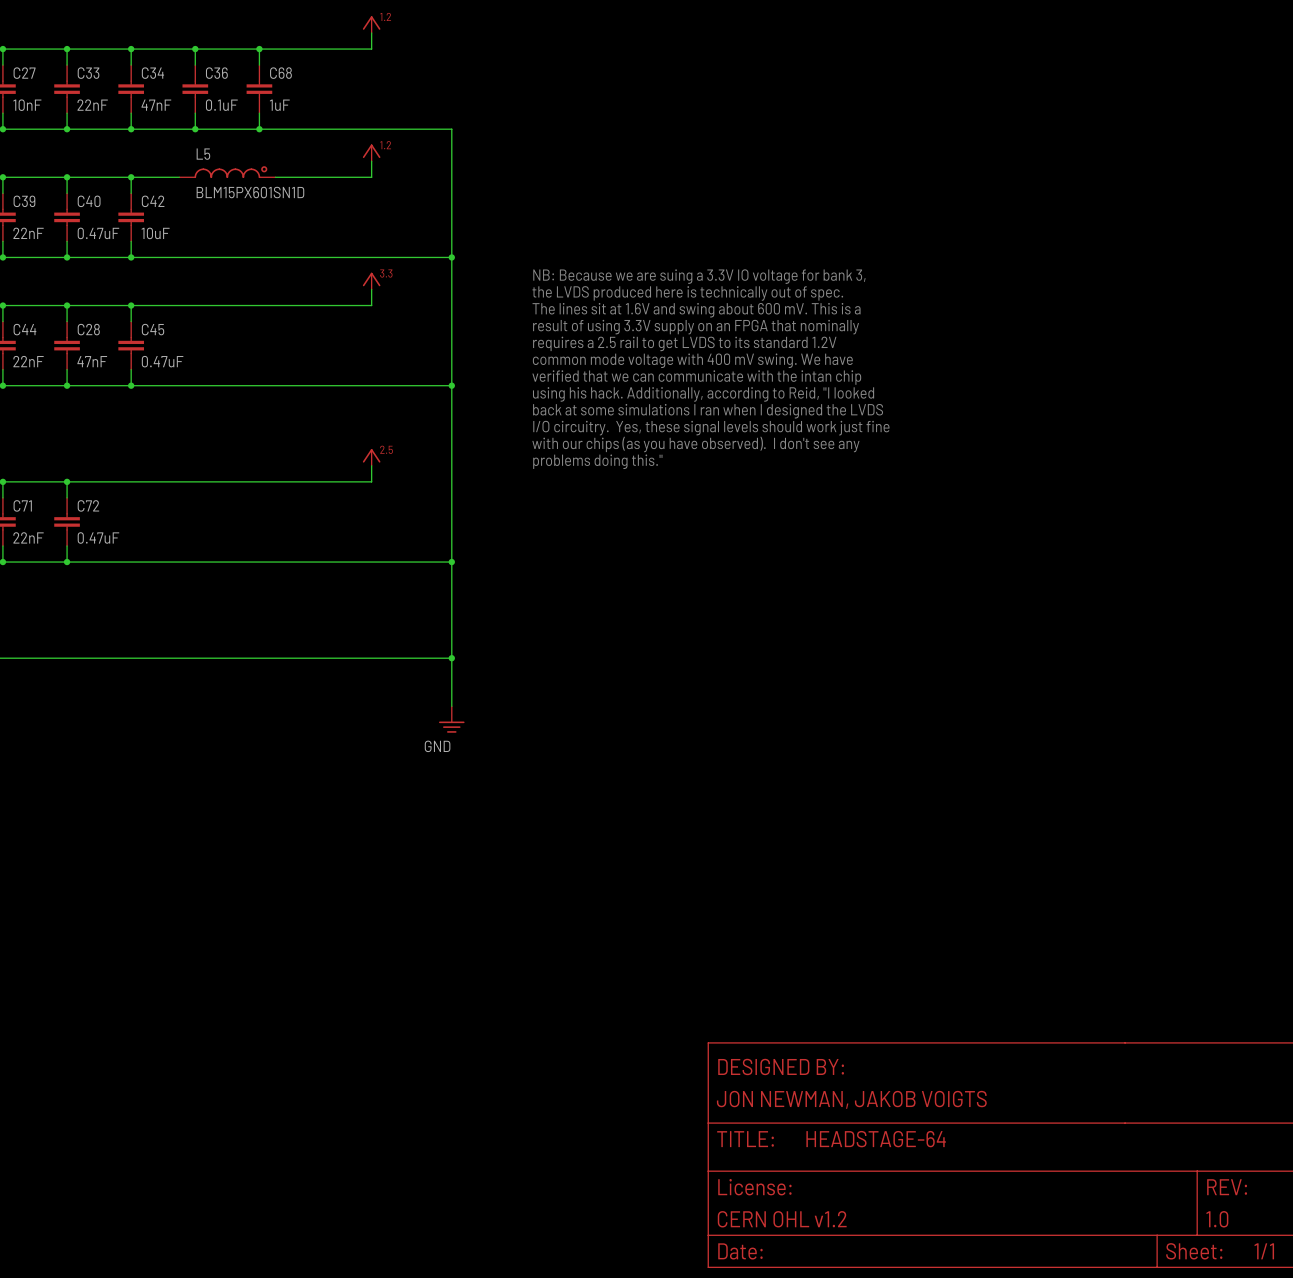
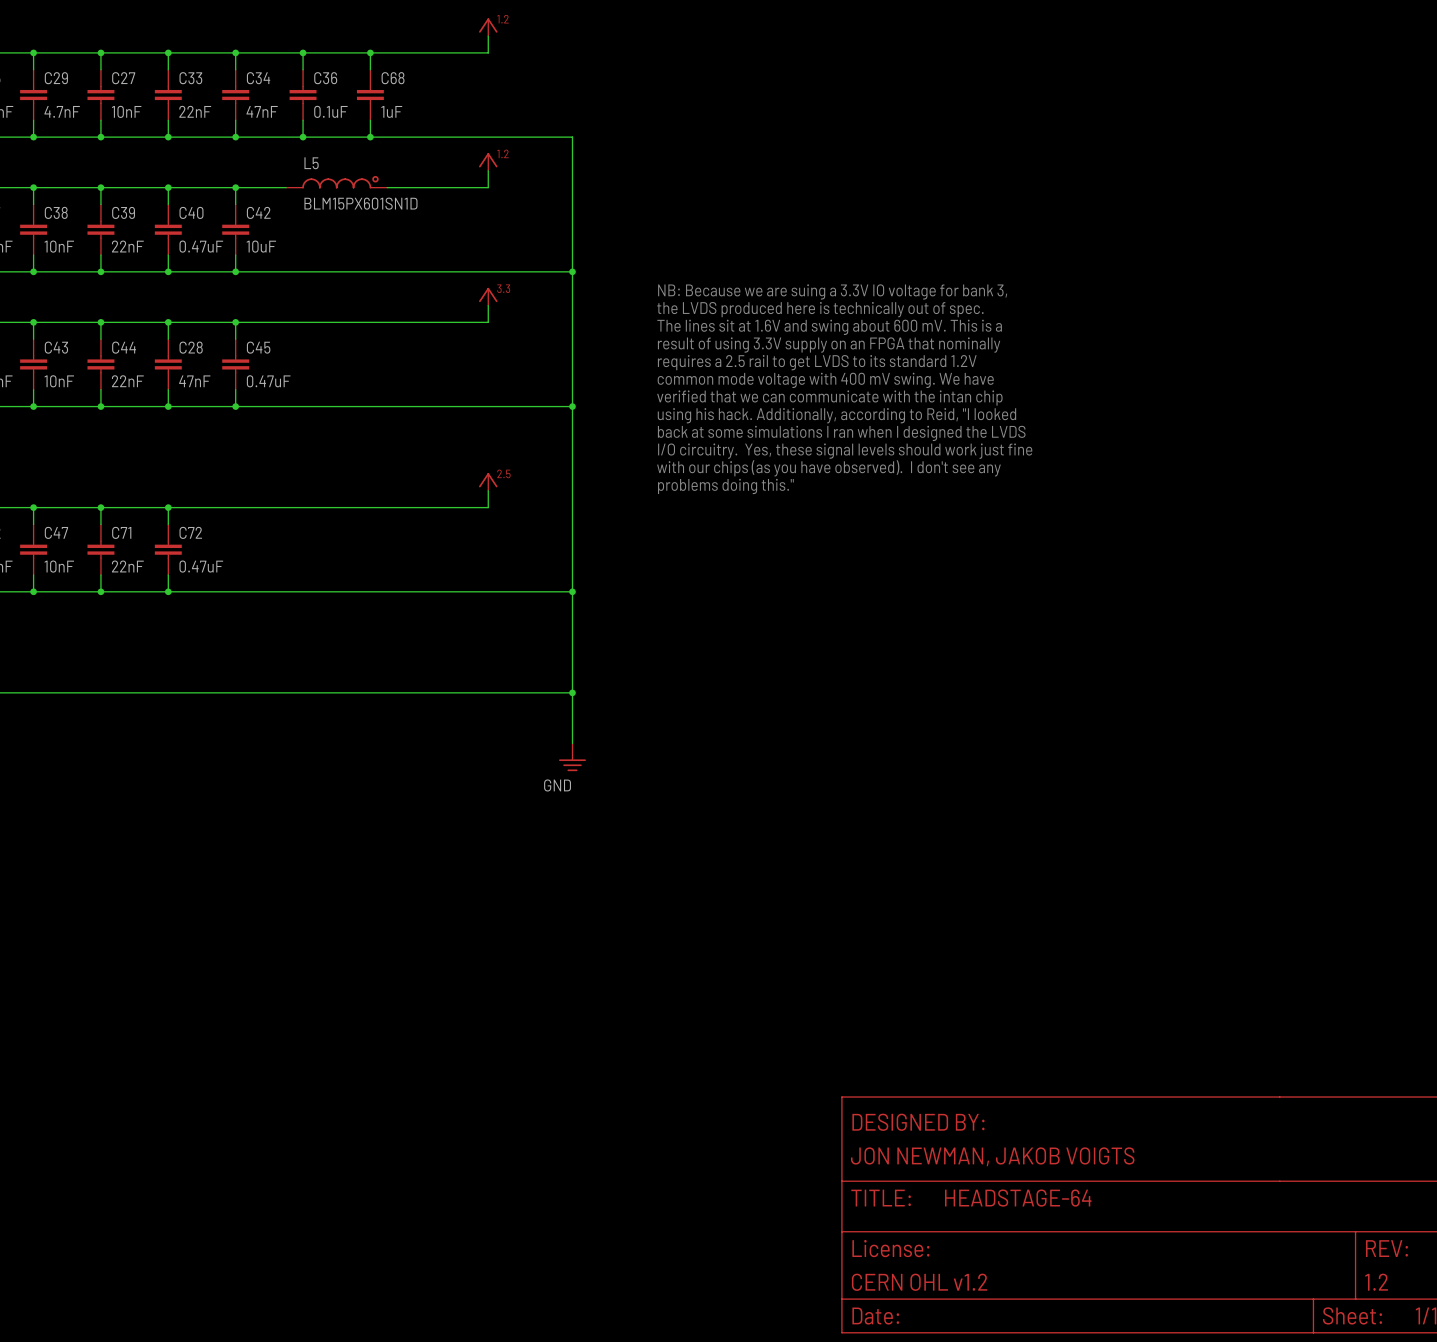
part text: 1.0 (1217, 1219) -> 1.2 (1376, 1282)

